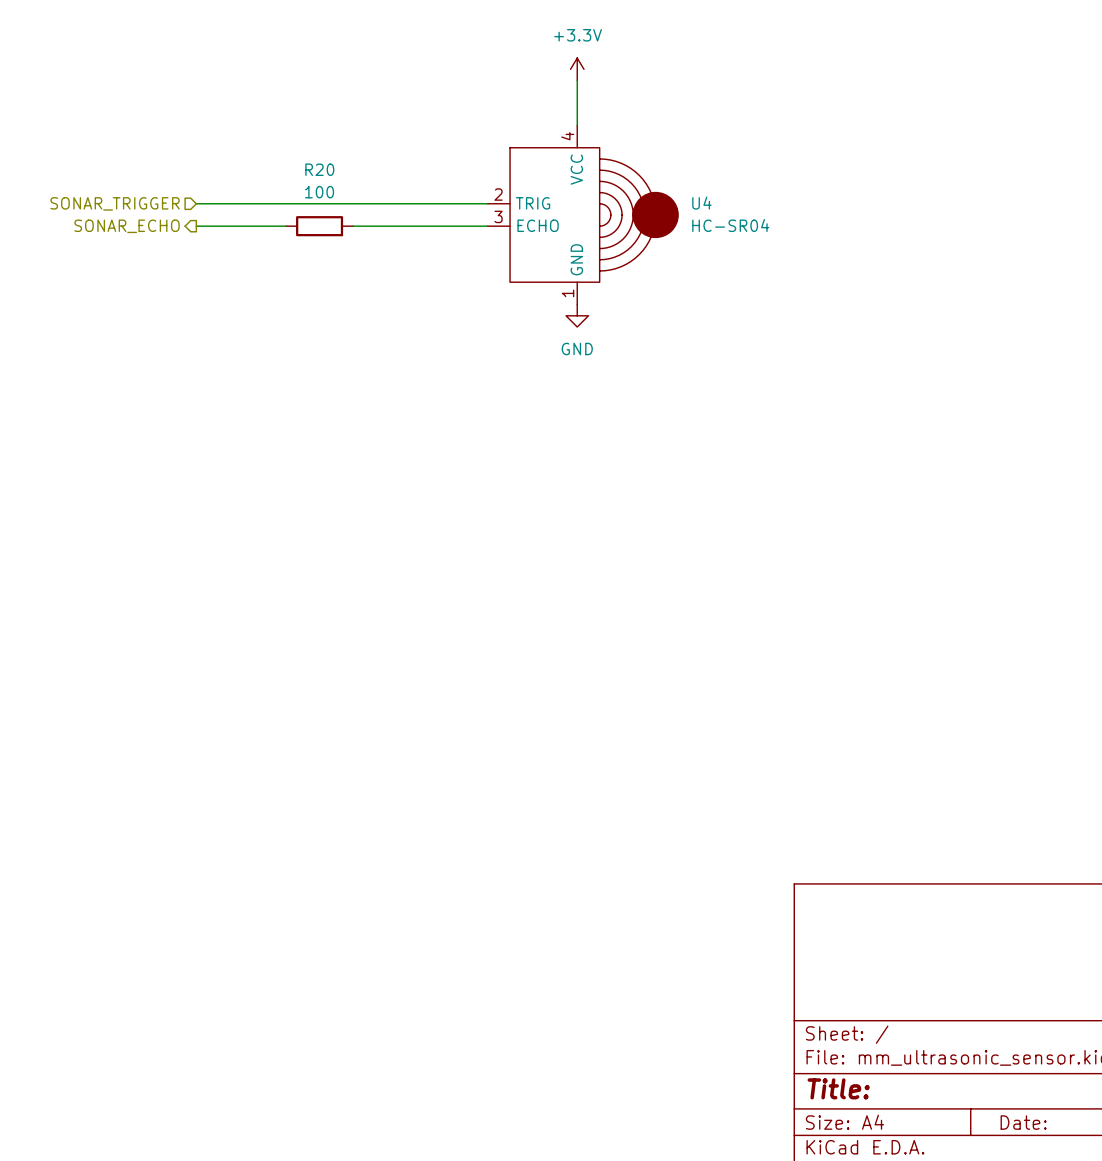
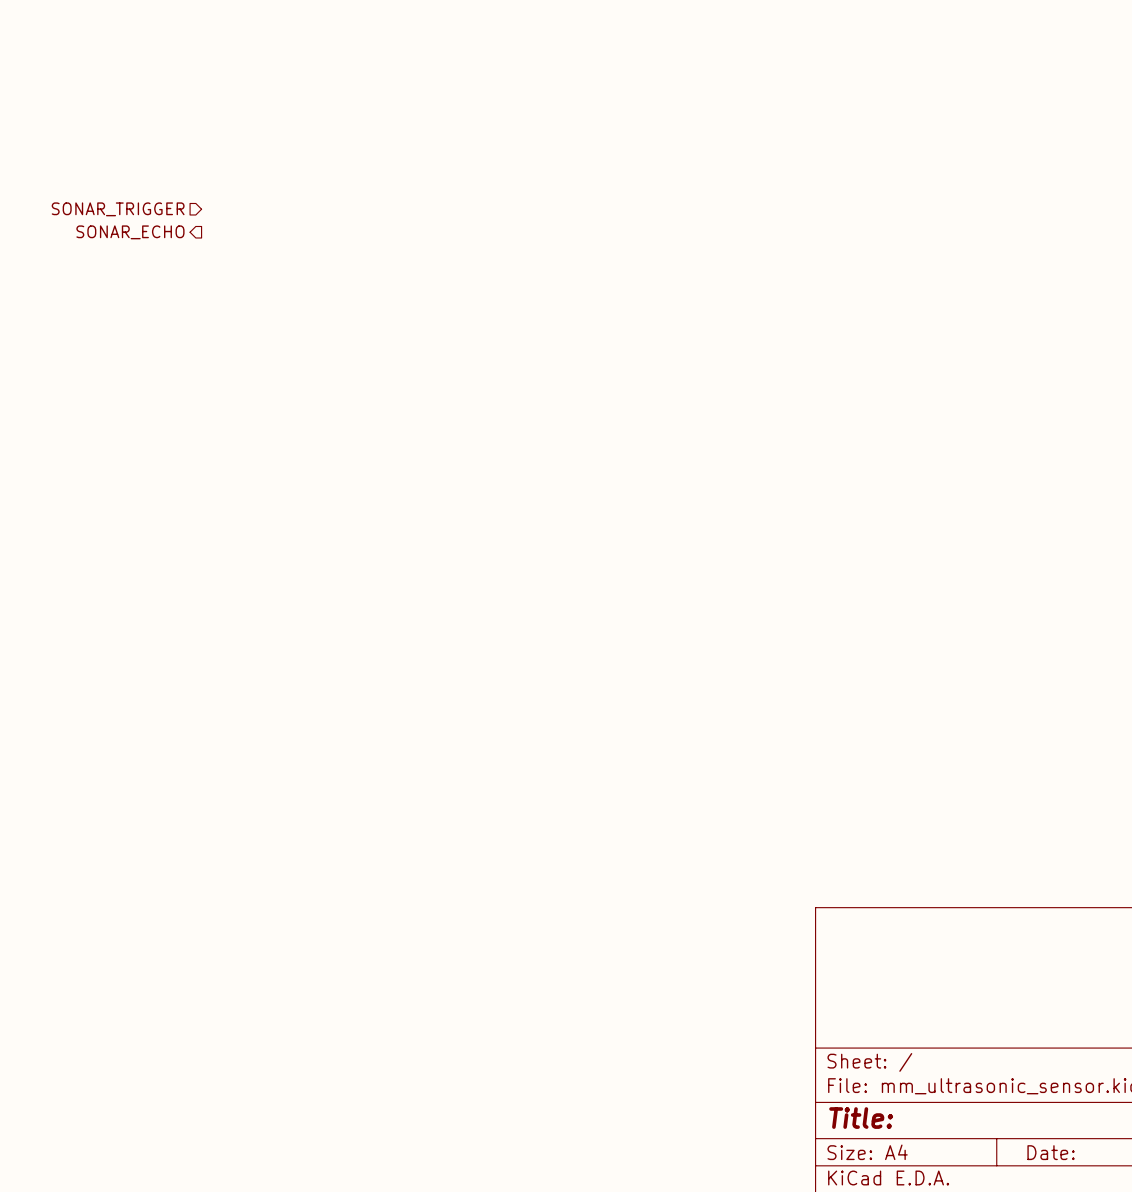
power symbol: +3.3V (577, 69) -> none
wire: (577, 80) (577, 125) -> none
wire: (196, 203) (487, 203) -> none
U4: HC-SR04 (582, 214) -> none
wire: (196, 226) (285, 226) -> none
R20: 100 (319, 226) -> none
wire: (353, 226) (487, 226) -> none
power symbol: GND (577, 315) -> none

